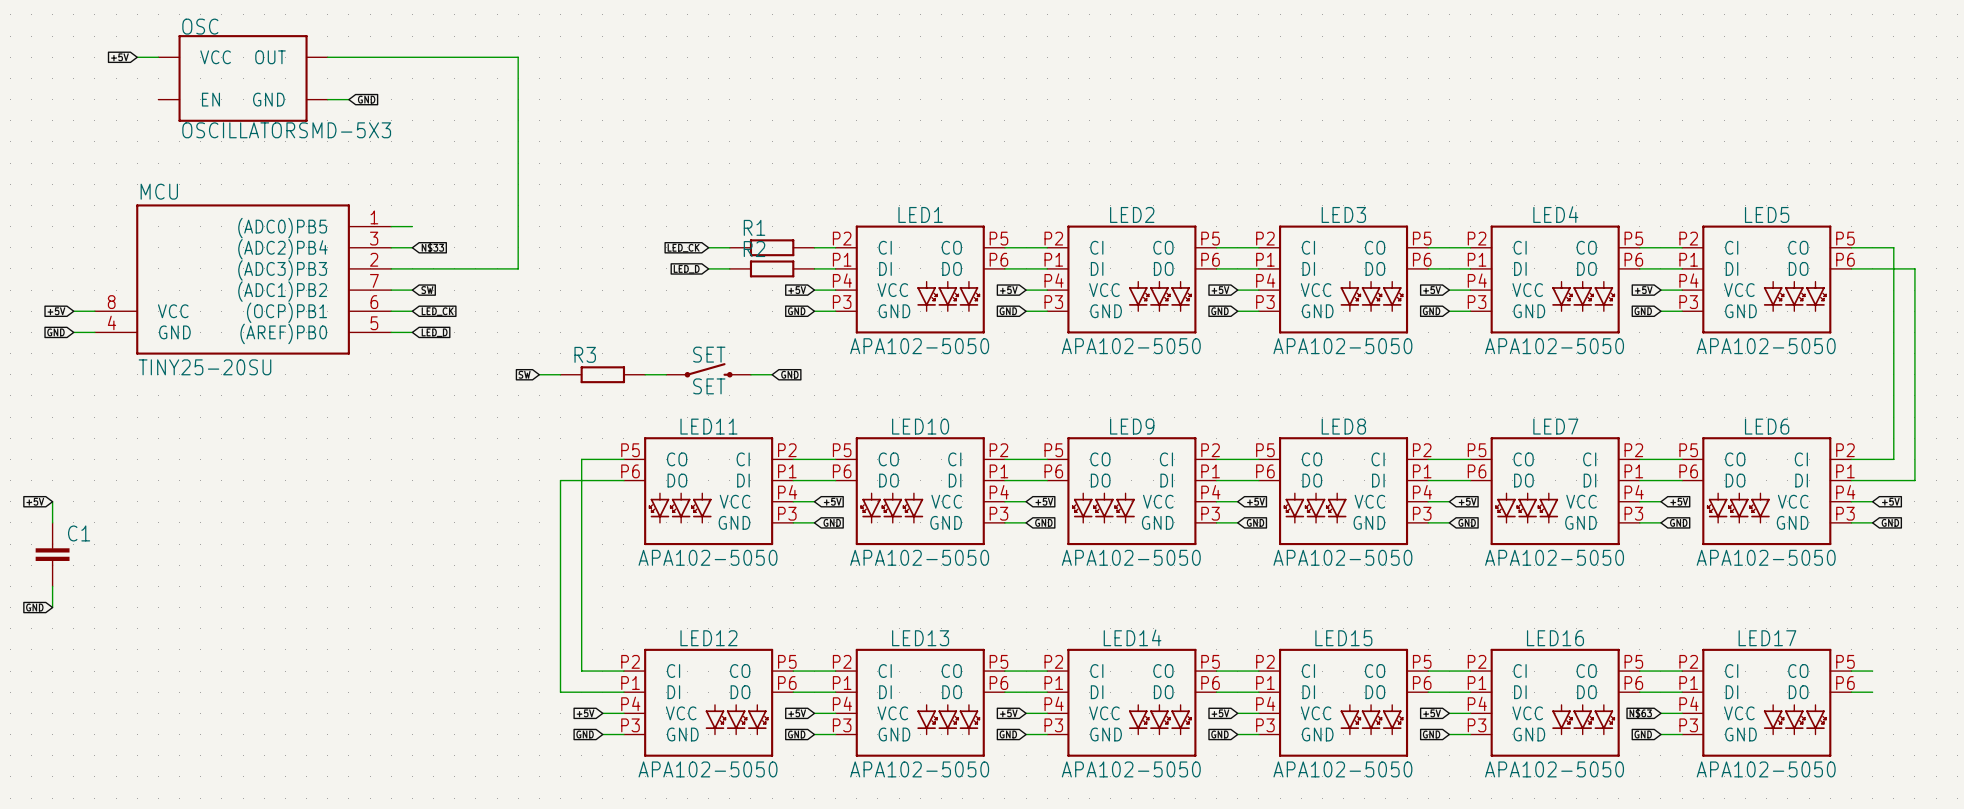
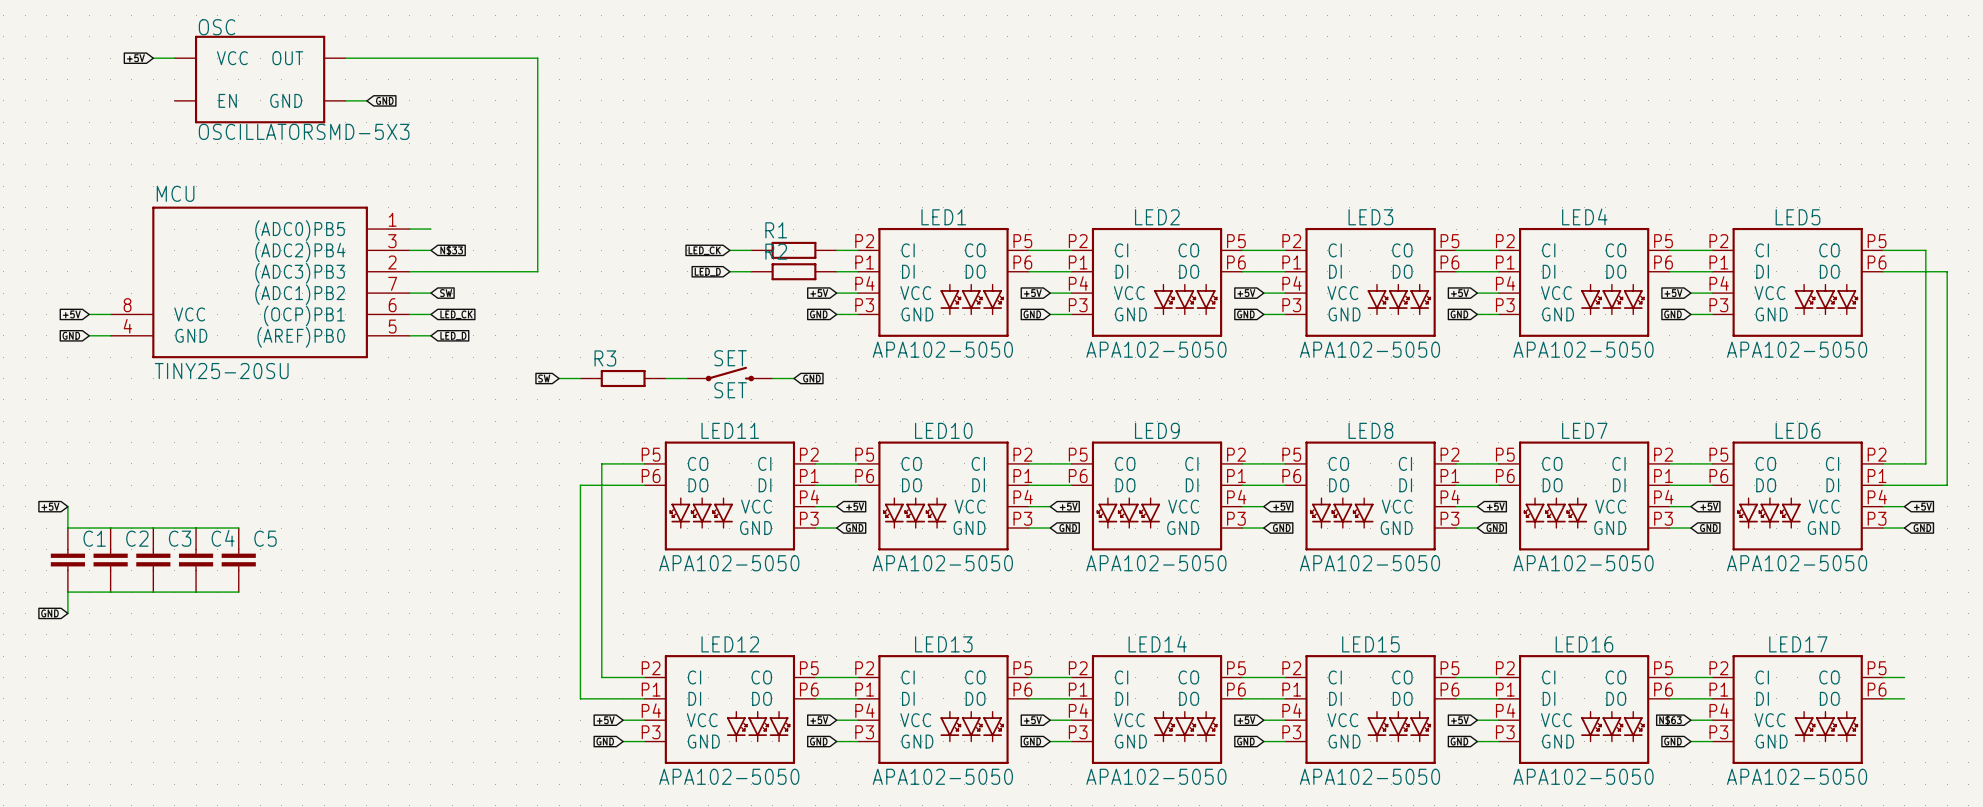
wire: none -> (67, 528) (238, 528)
C2: none -> (110, 560)
C3: none -> (153, 560)
C4: none -> (196, 560)
C5: none -> (238, 560)
wire: none -> (67, 592) (238, 592)

